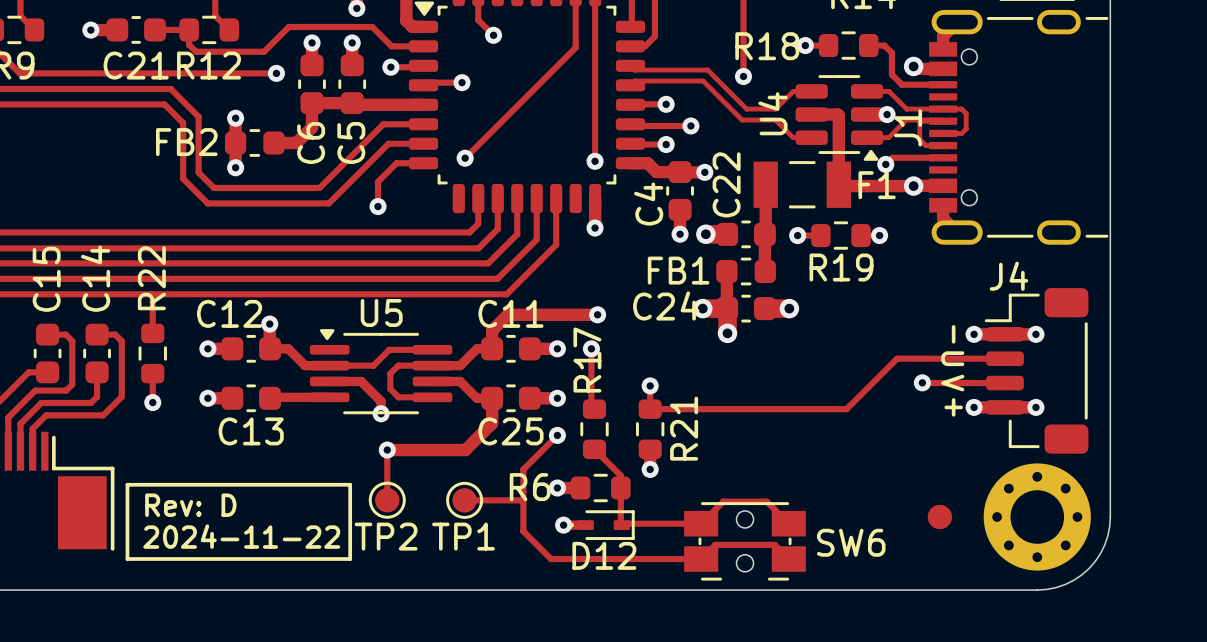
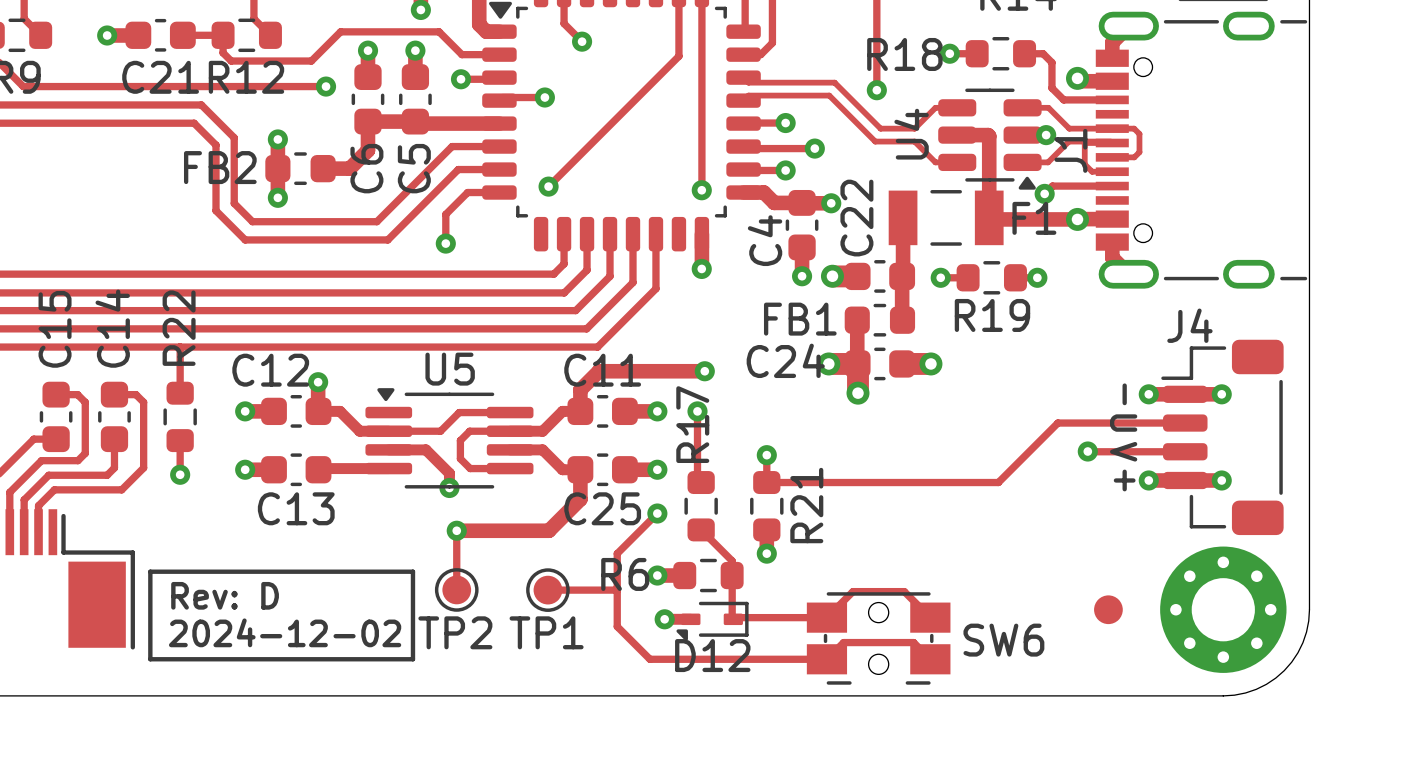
D12 footprint: [569, 510, 635, 540] -> [676, 601, 749, 641]
text: 2024-11-22 (241, 536) -> 2024-12-02 (285, 632)

